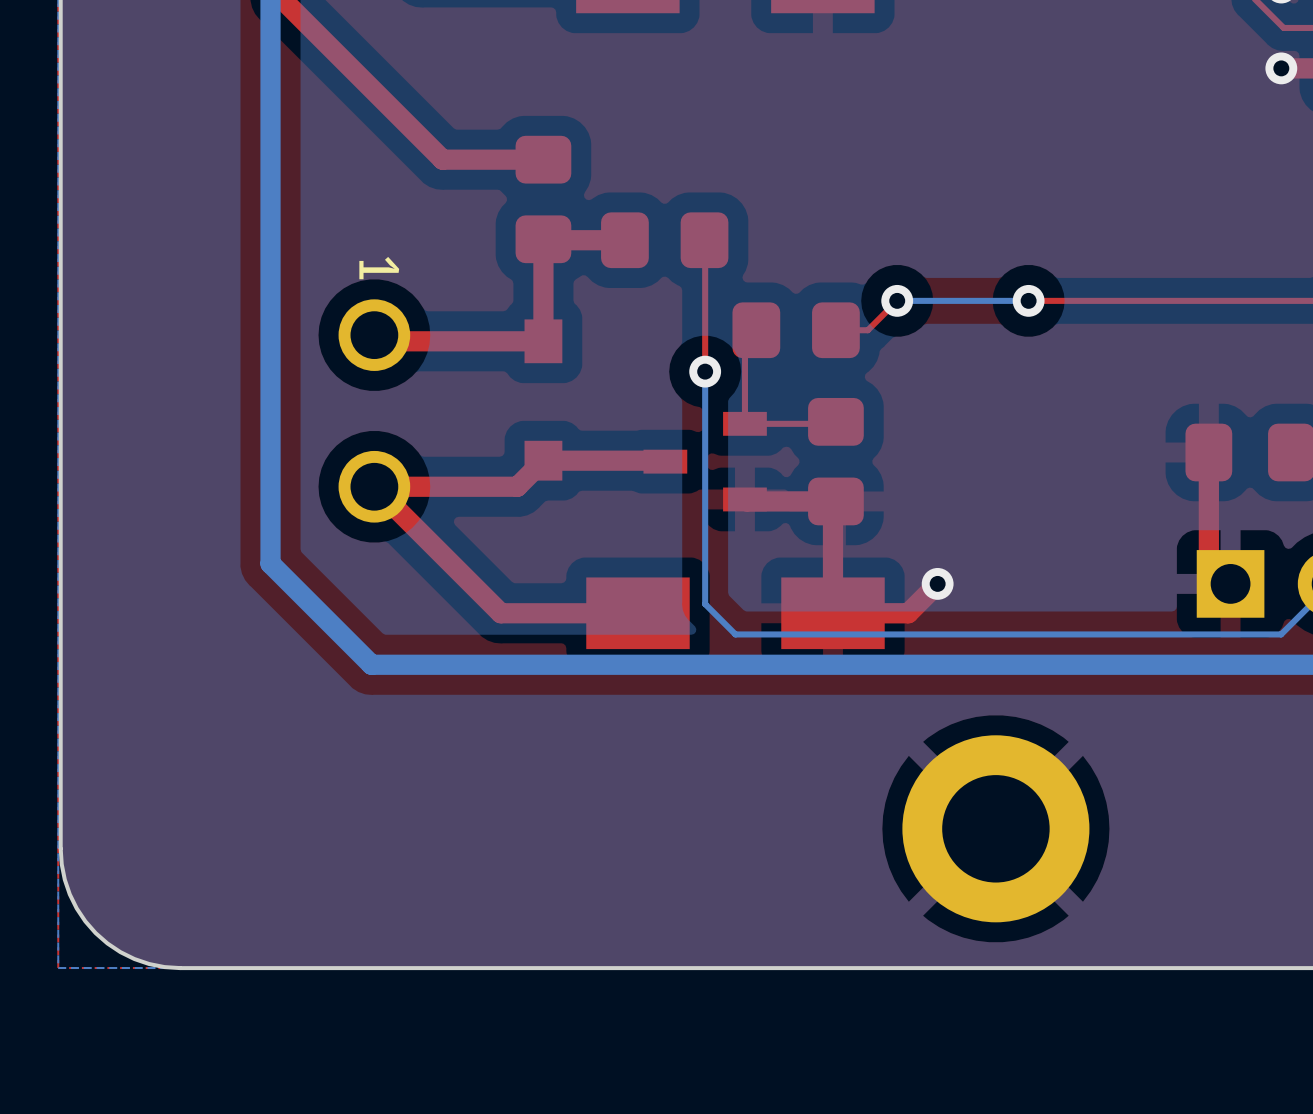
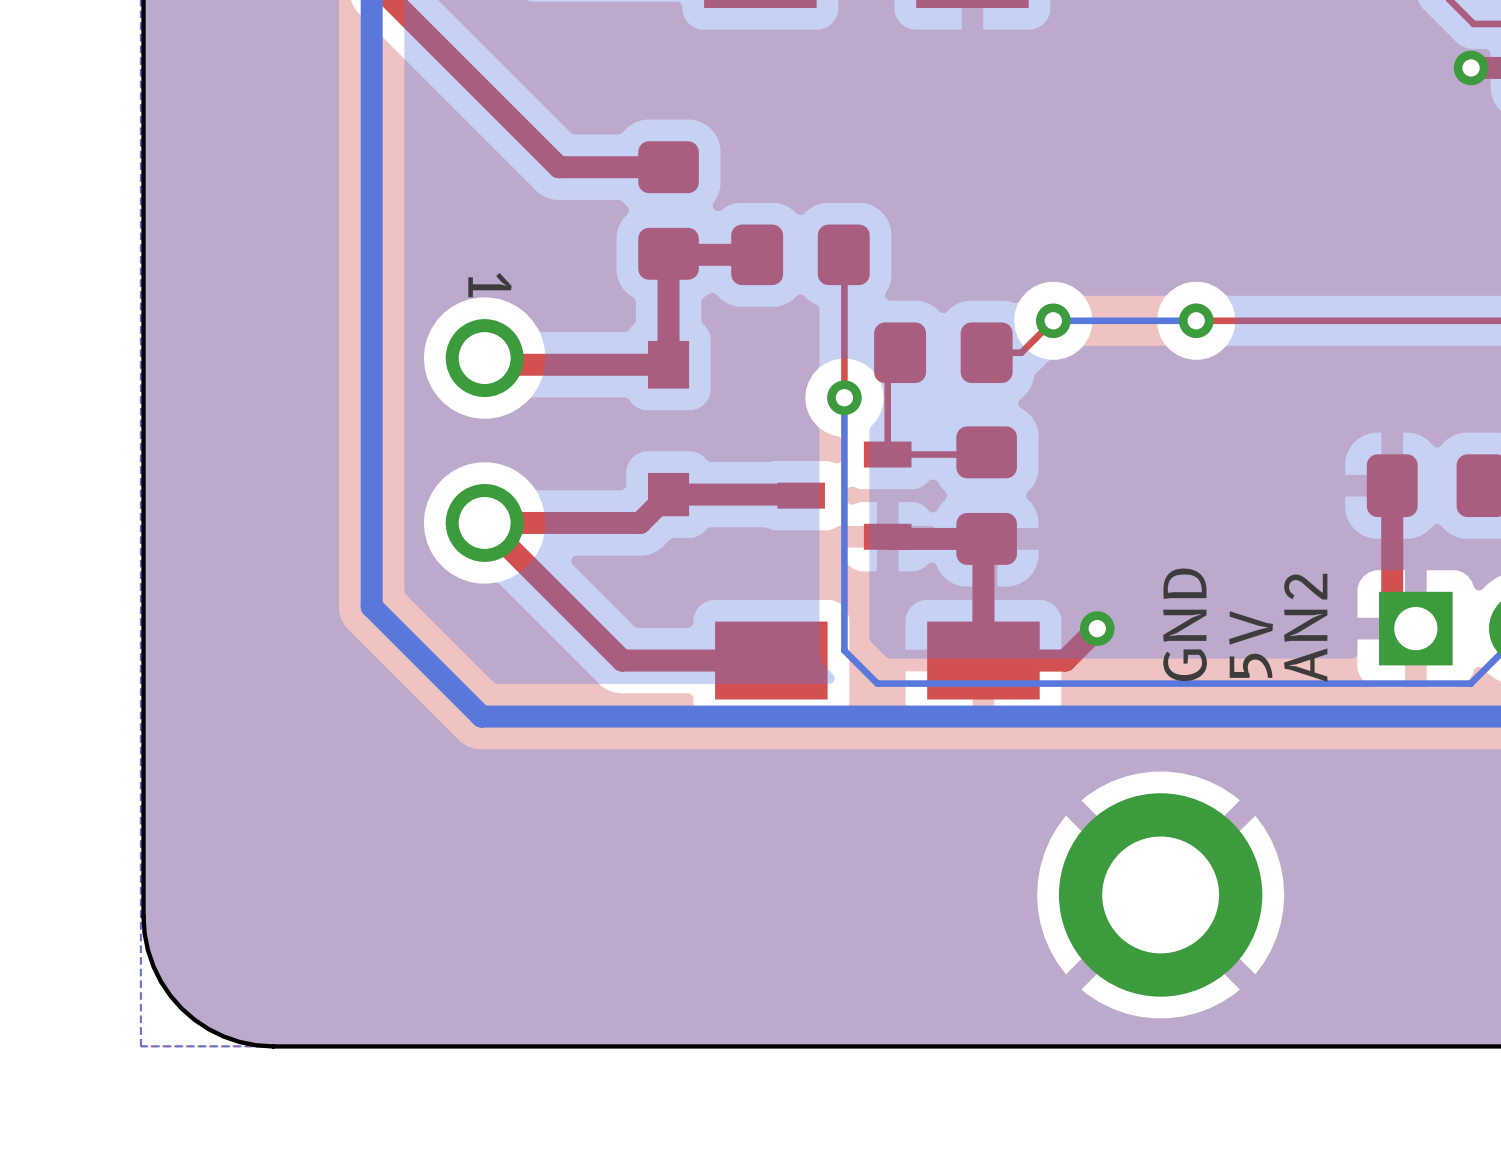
text: none -> GND (1185, 624)
text: none -> AN2 (1305, 627)
text: none -> 5V (1251, 644)

